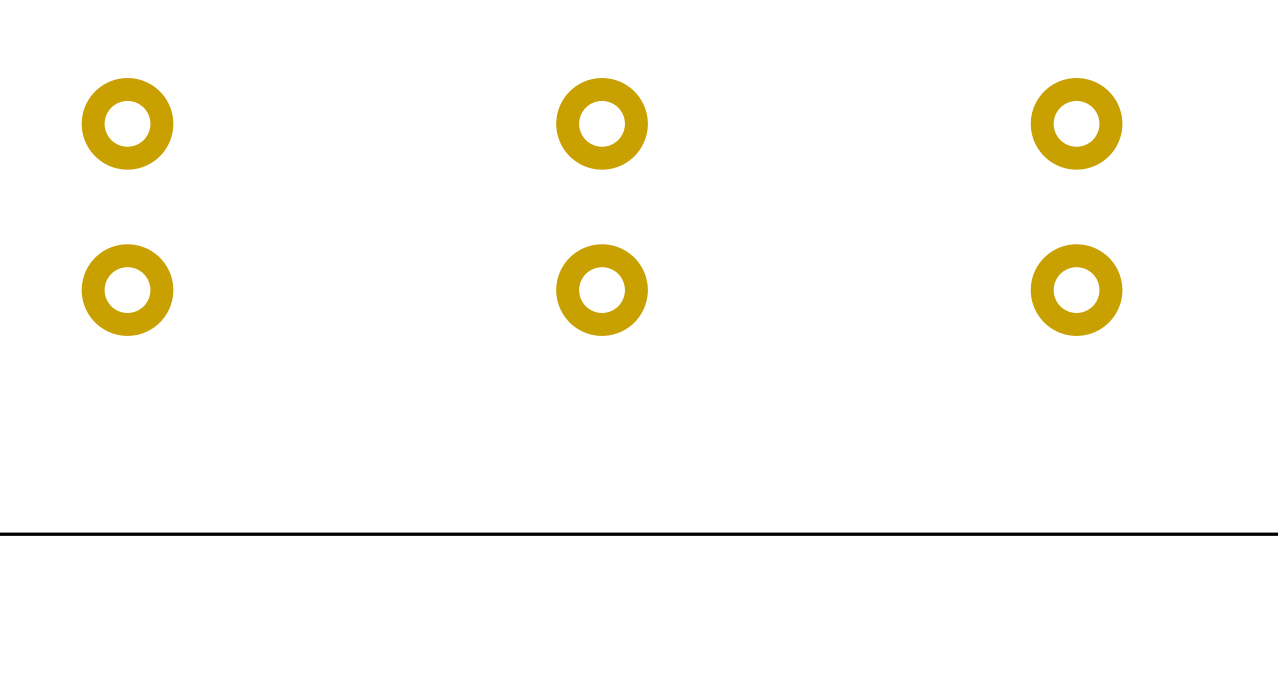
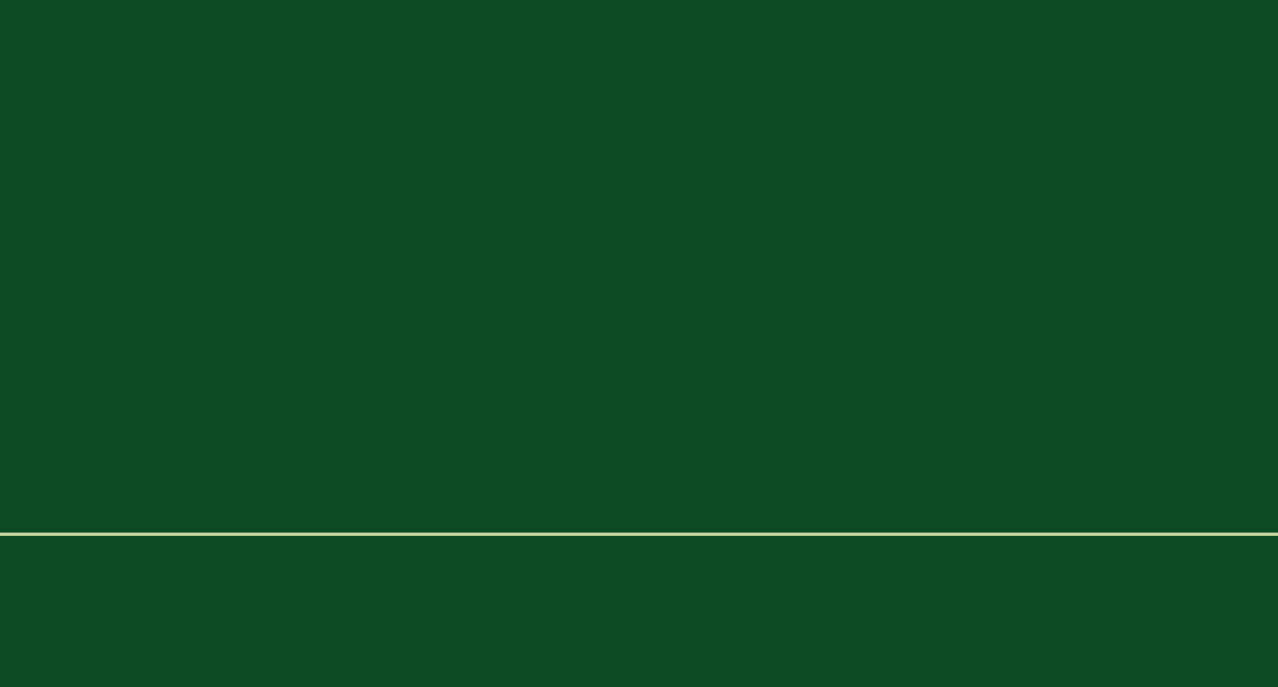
part: (127, 206) -> none
part: (602, 206) -> none
part: (1076, 206) -> none

